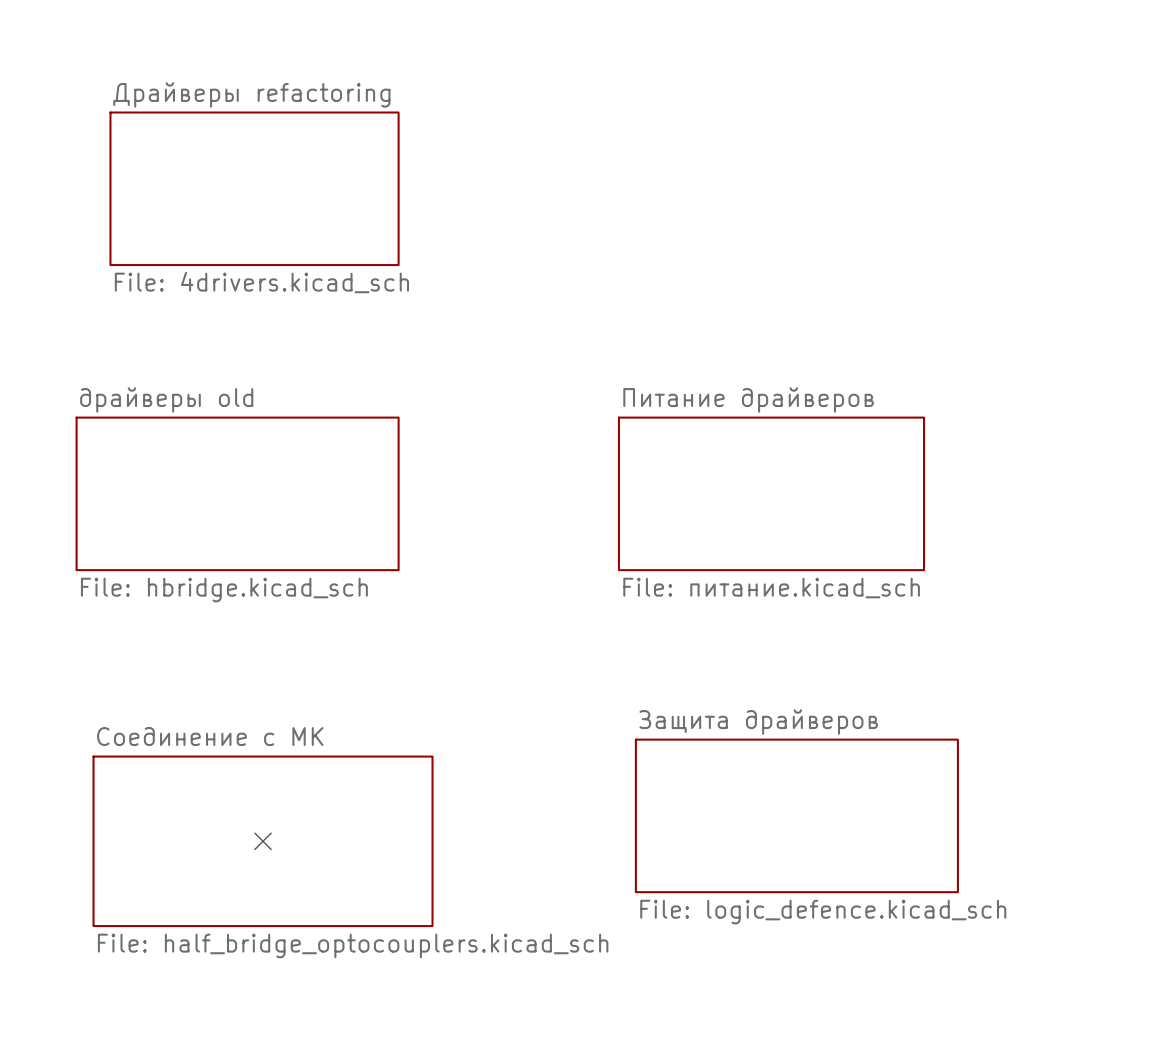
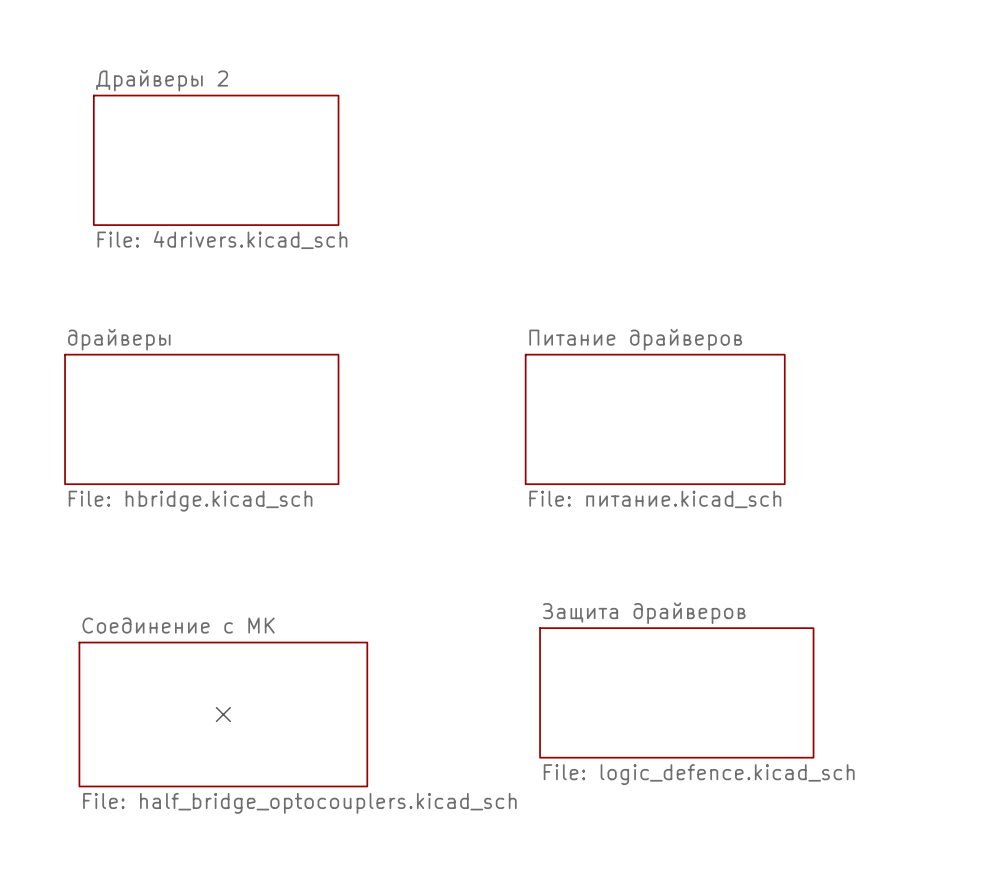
sheet Драйверы refactoring name: Драйверы refactoring (251, 94) -> Драйверы 2 (162, 80)
sheet драйверы old name: драйверы old (166, 399) -> драйверы (119, 339)

